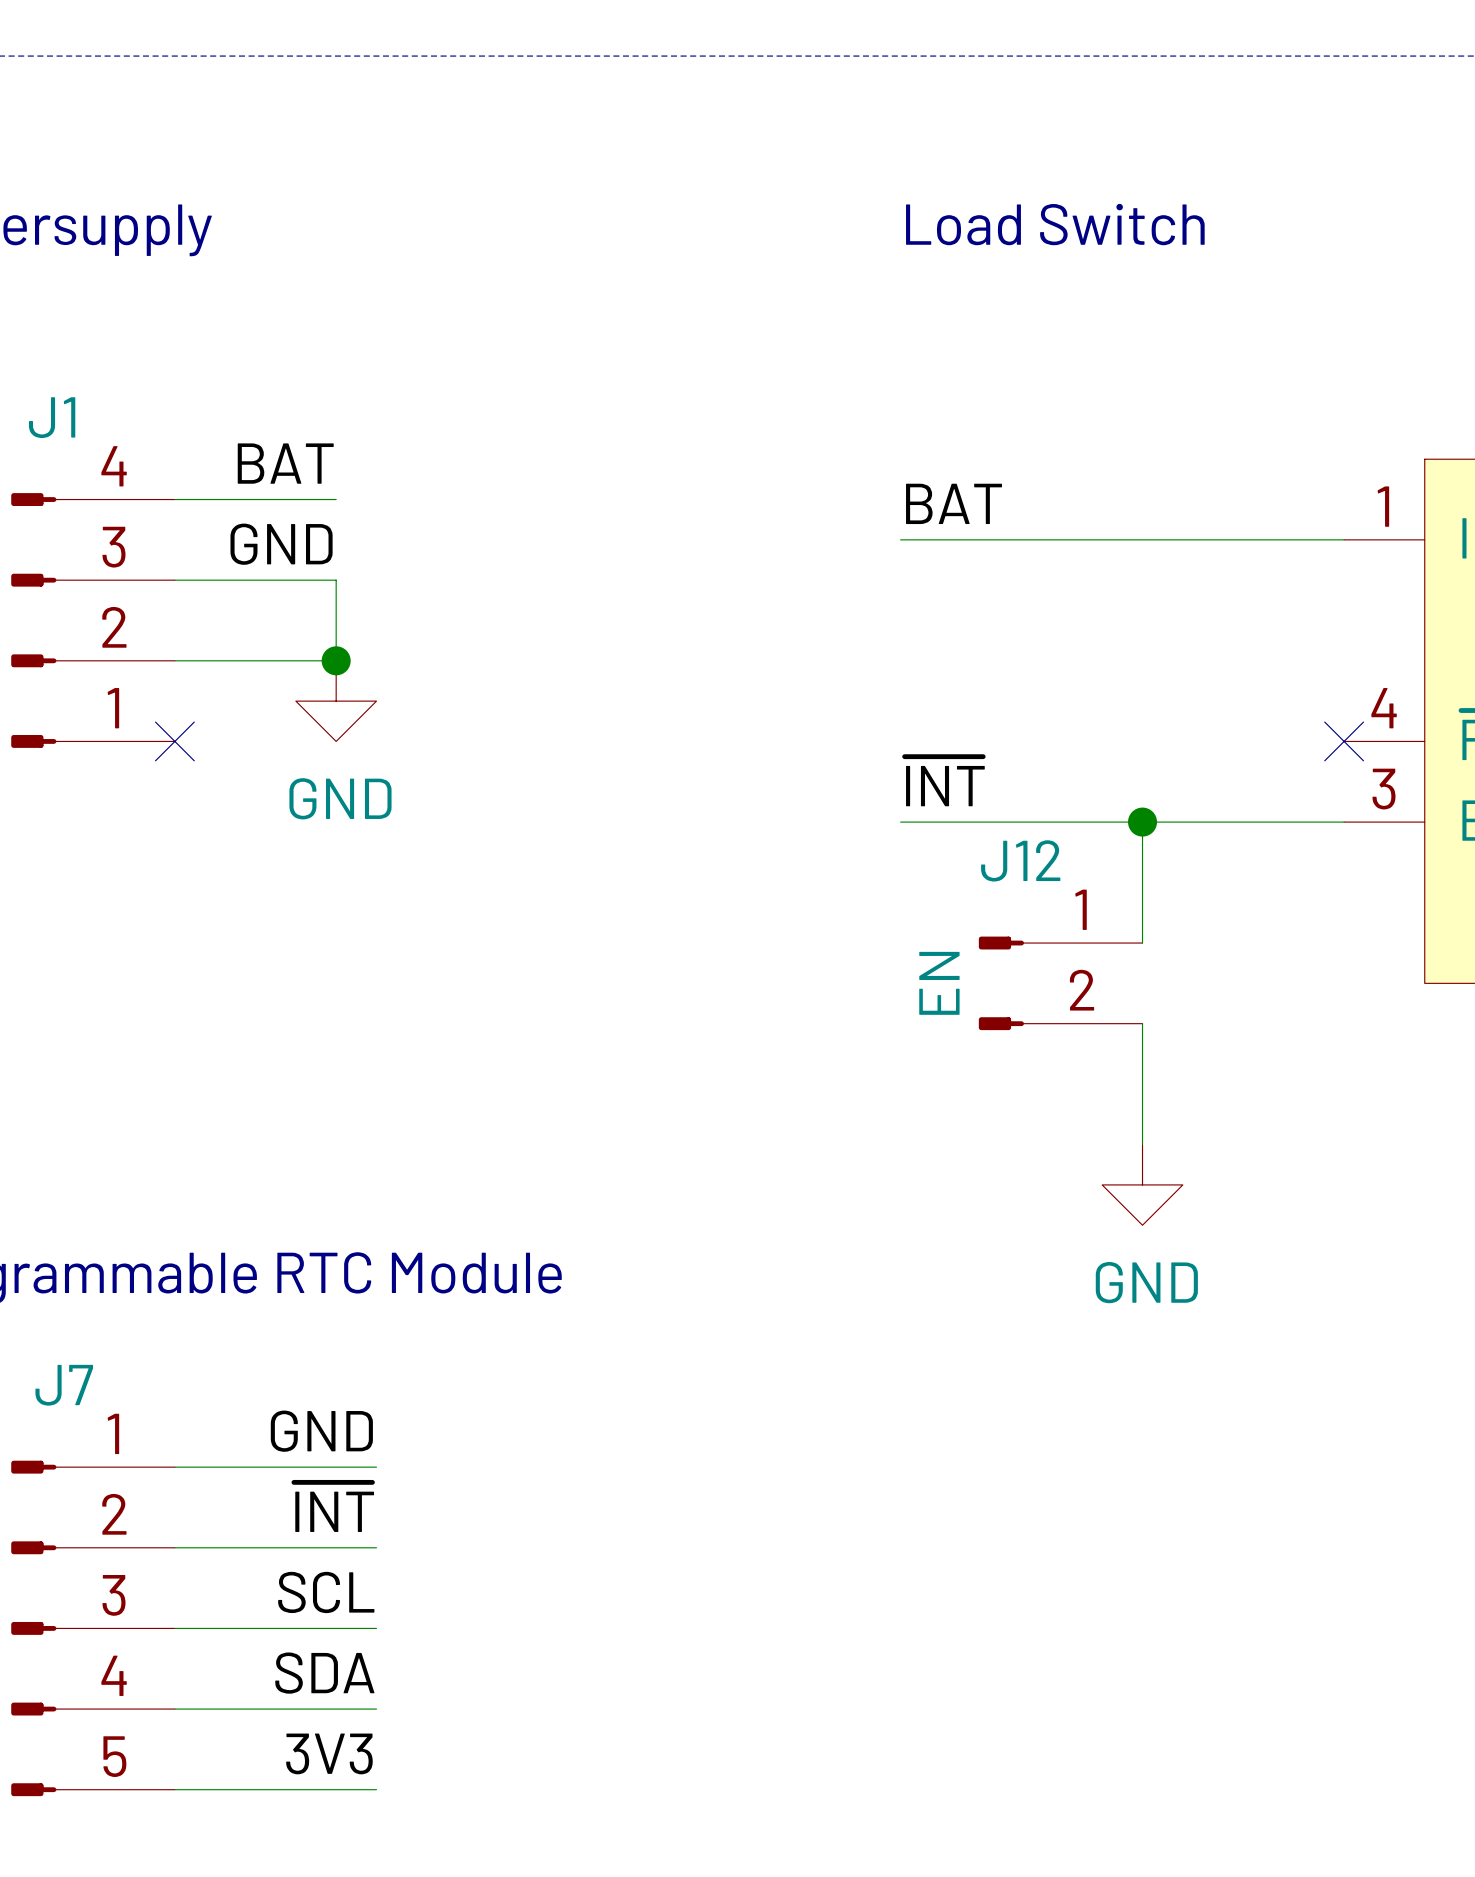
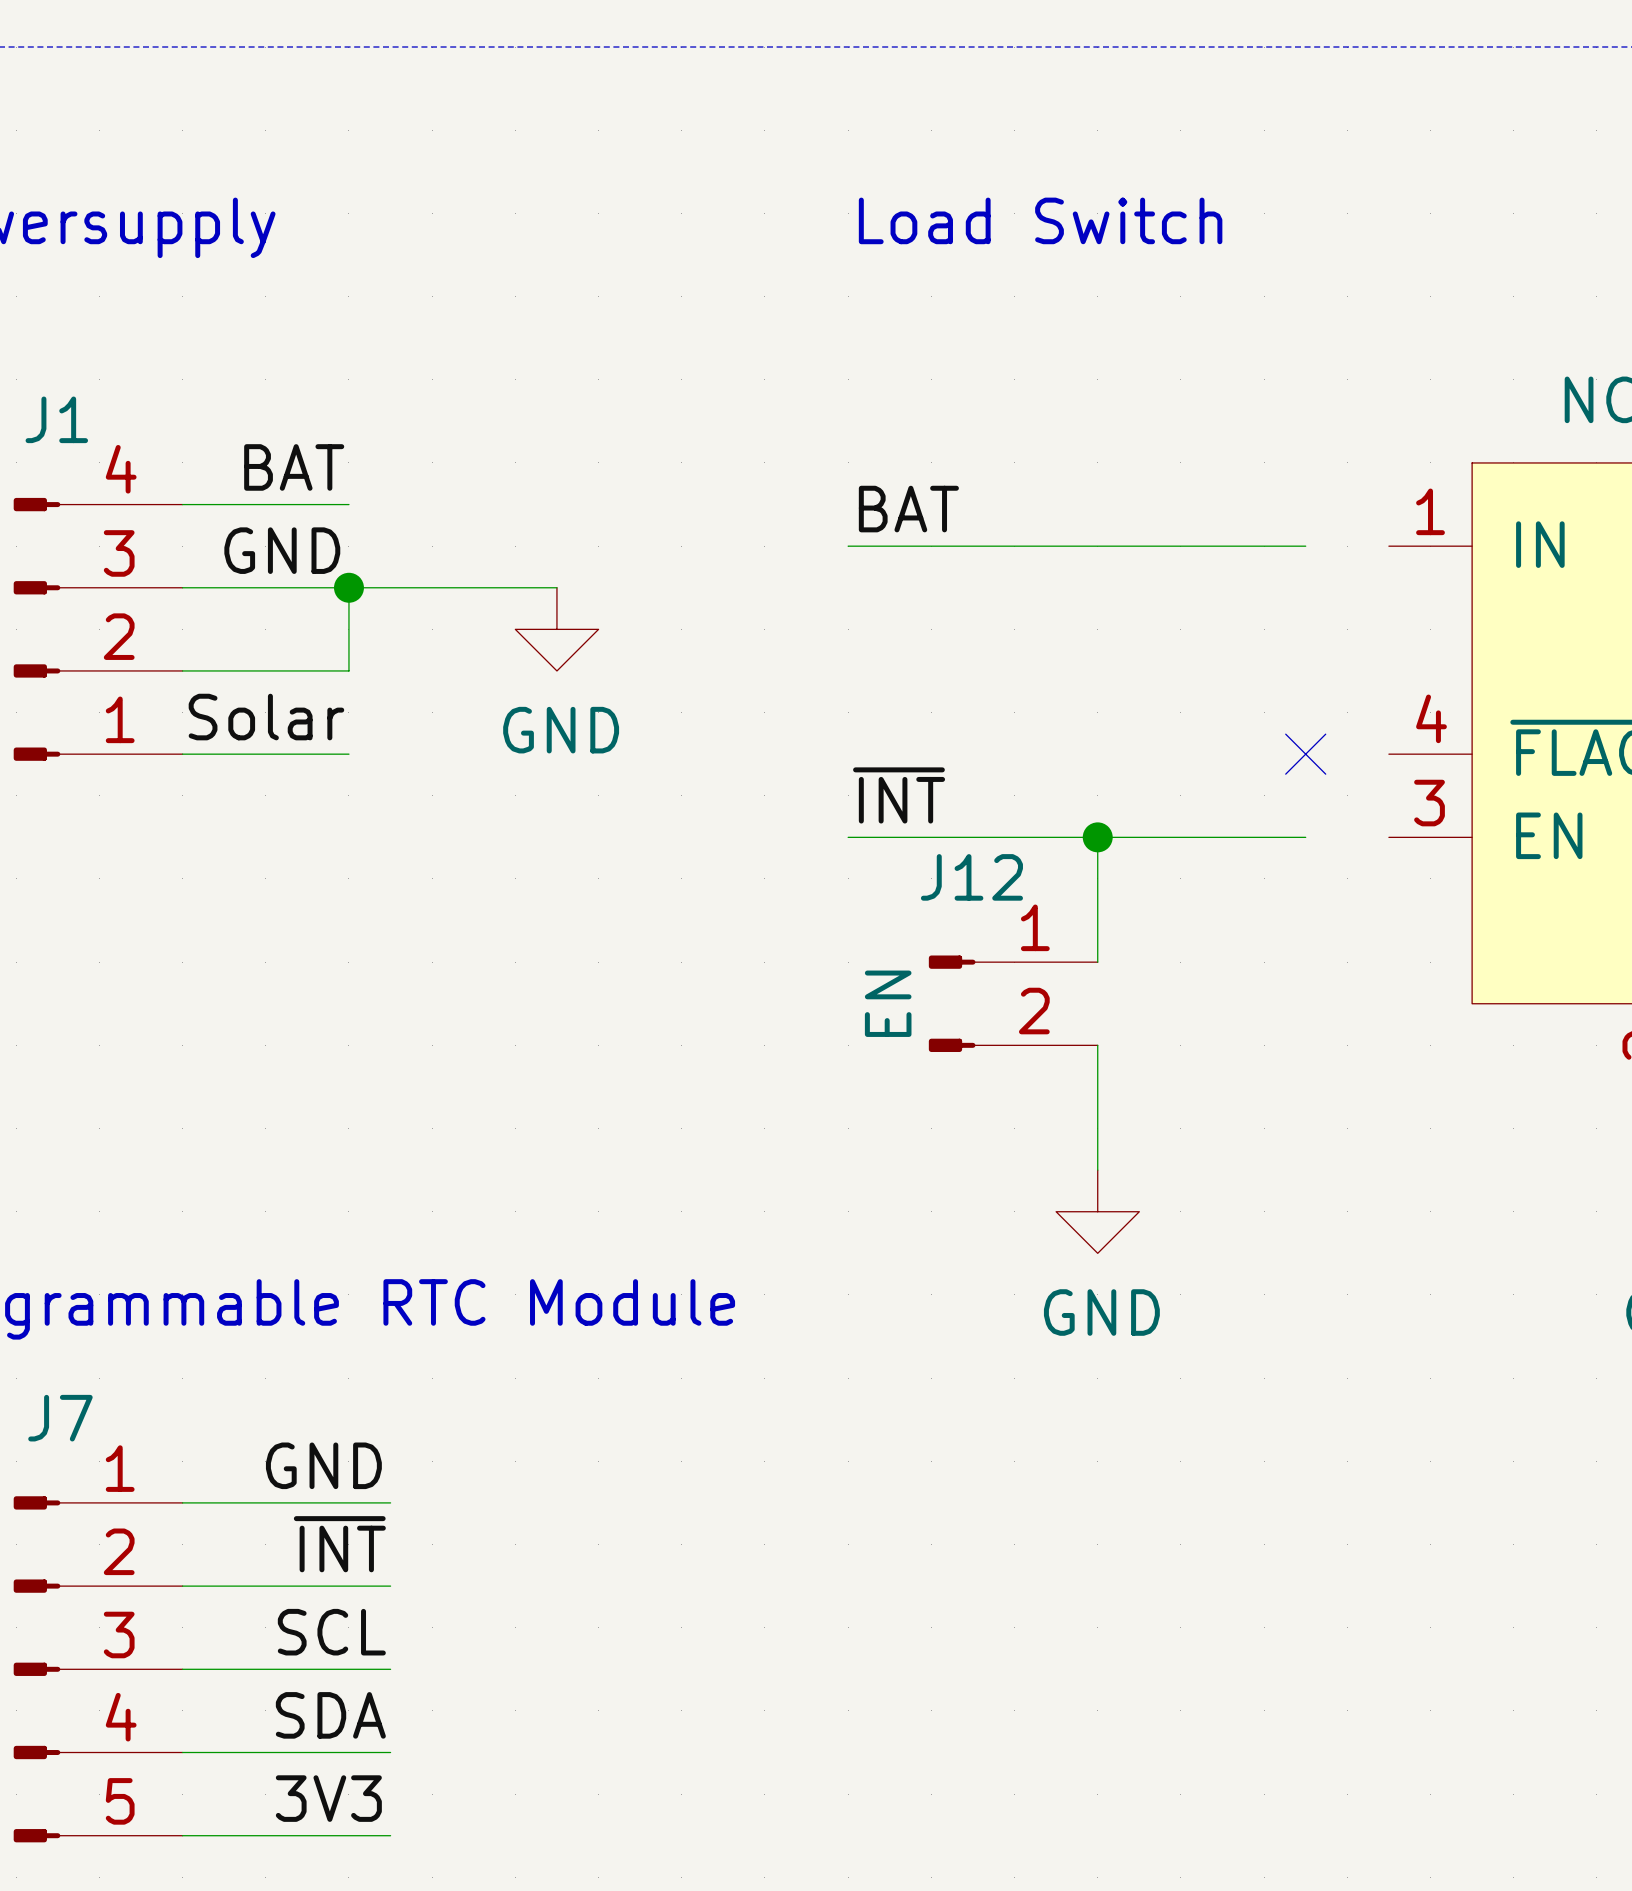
text position: Load Switch (1055, 224) -> Load Switch (1040, 220)
label position: BAT (954, 503) -> BAT (908, 509)
wire: (1263, 539) (1344, 539) -> (848, 546) (931, 546)
wire: none -> (348, 587) (556, 587)
junction position: (336, 660) -> (348, 587)
power symbol position: GND (336, 701) -> GND (556, 629)
label: none -> Solar (266, 717)
wire: none -> (182, 754) (348, 754)
no-connect mark: (174, 741) -> none
no-connect mark position: (1344, 741) -> (1305, 754)
label position: ~{INT} (944, 781) -> ~{INT} (899, 795)
wire: (1142, 822) (1142, 943) -> (1097, 837) (1097, 962)
junction position: (1142, 822) -> (1097, 837)
wire: (1263, 822) (1344, 822) -> (848, 837) (931, 837)
J12 position: (1060, 983) -> (1013, 1003)
wire: (1142, 1023) (1142, 1144) -> (1097, 1045) (1097, 1170)
power symbol position: GND (1142, 1184) -> GND (1097, 1211)

